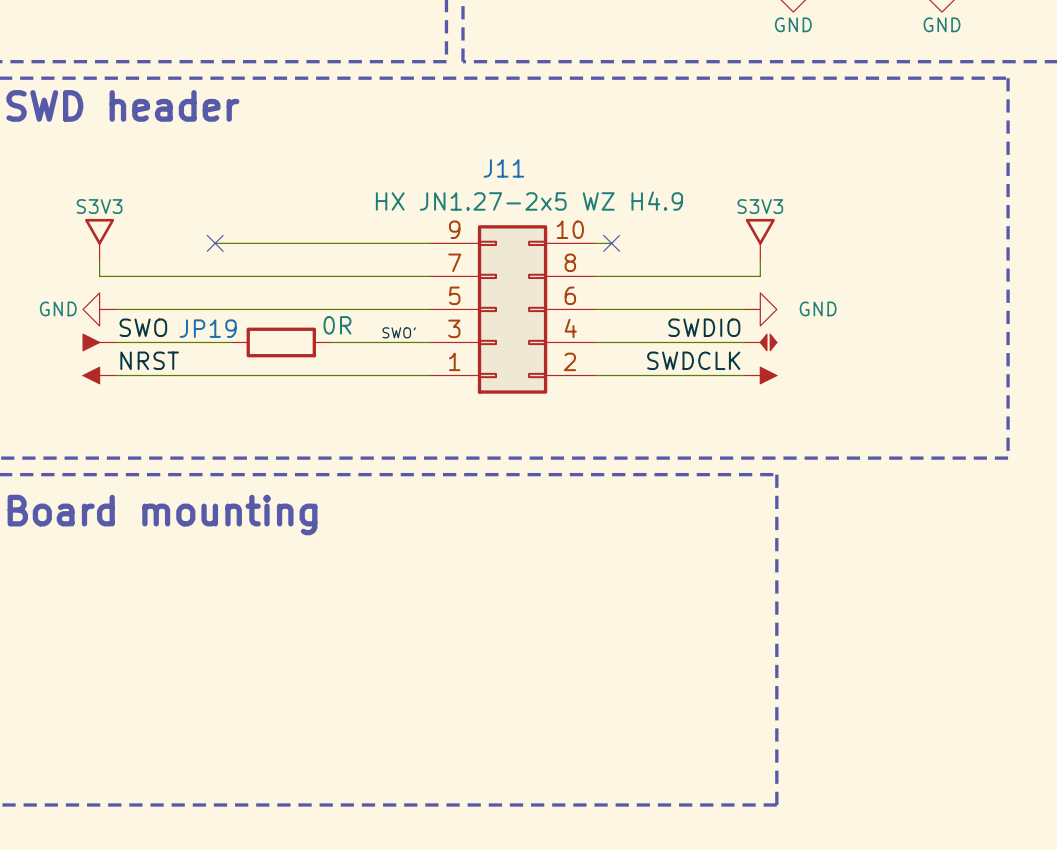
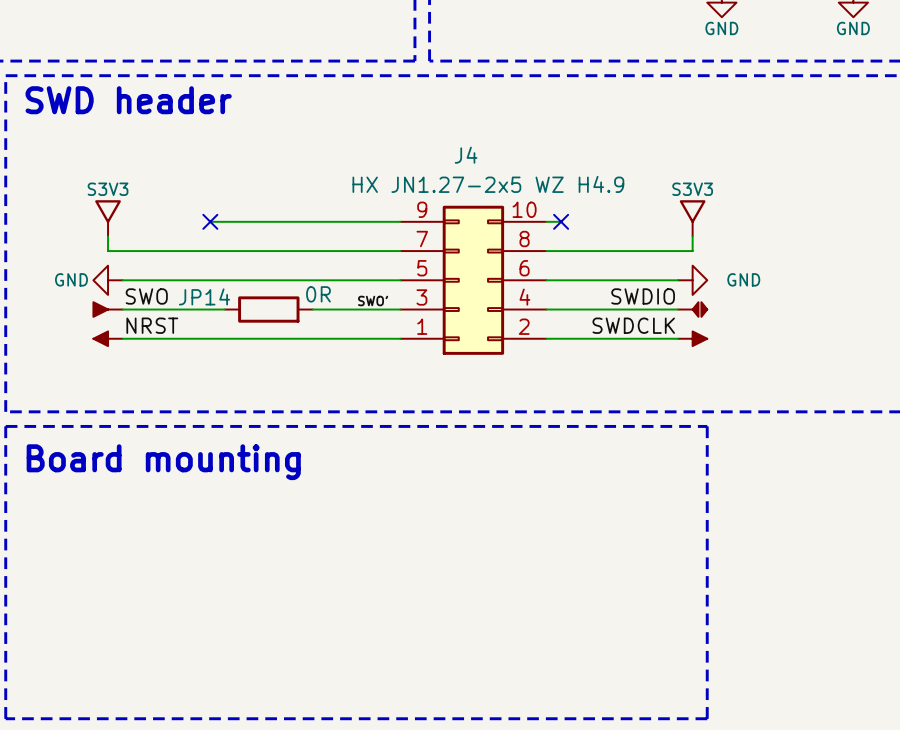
J11 name: J11 (503, 168) -> J4 (466, 155)
JP19 name: JP19 (208, 328) -> JP14 (204, 296)

